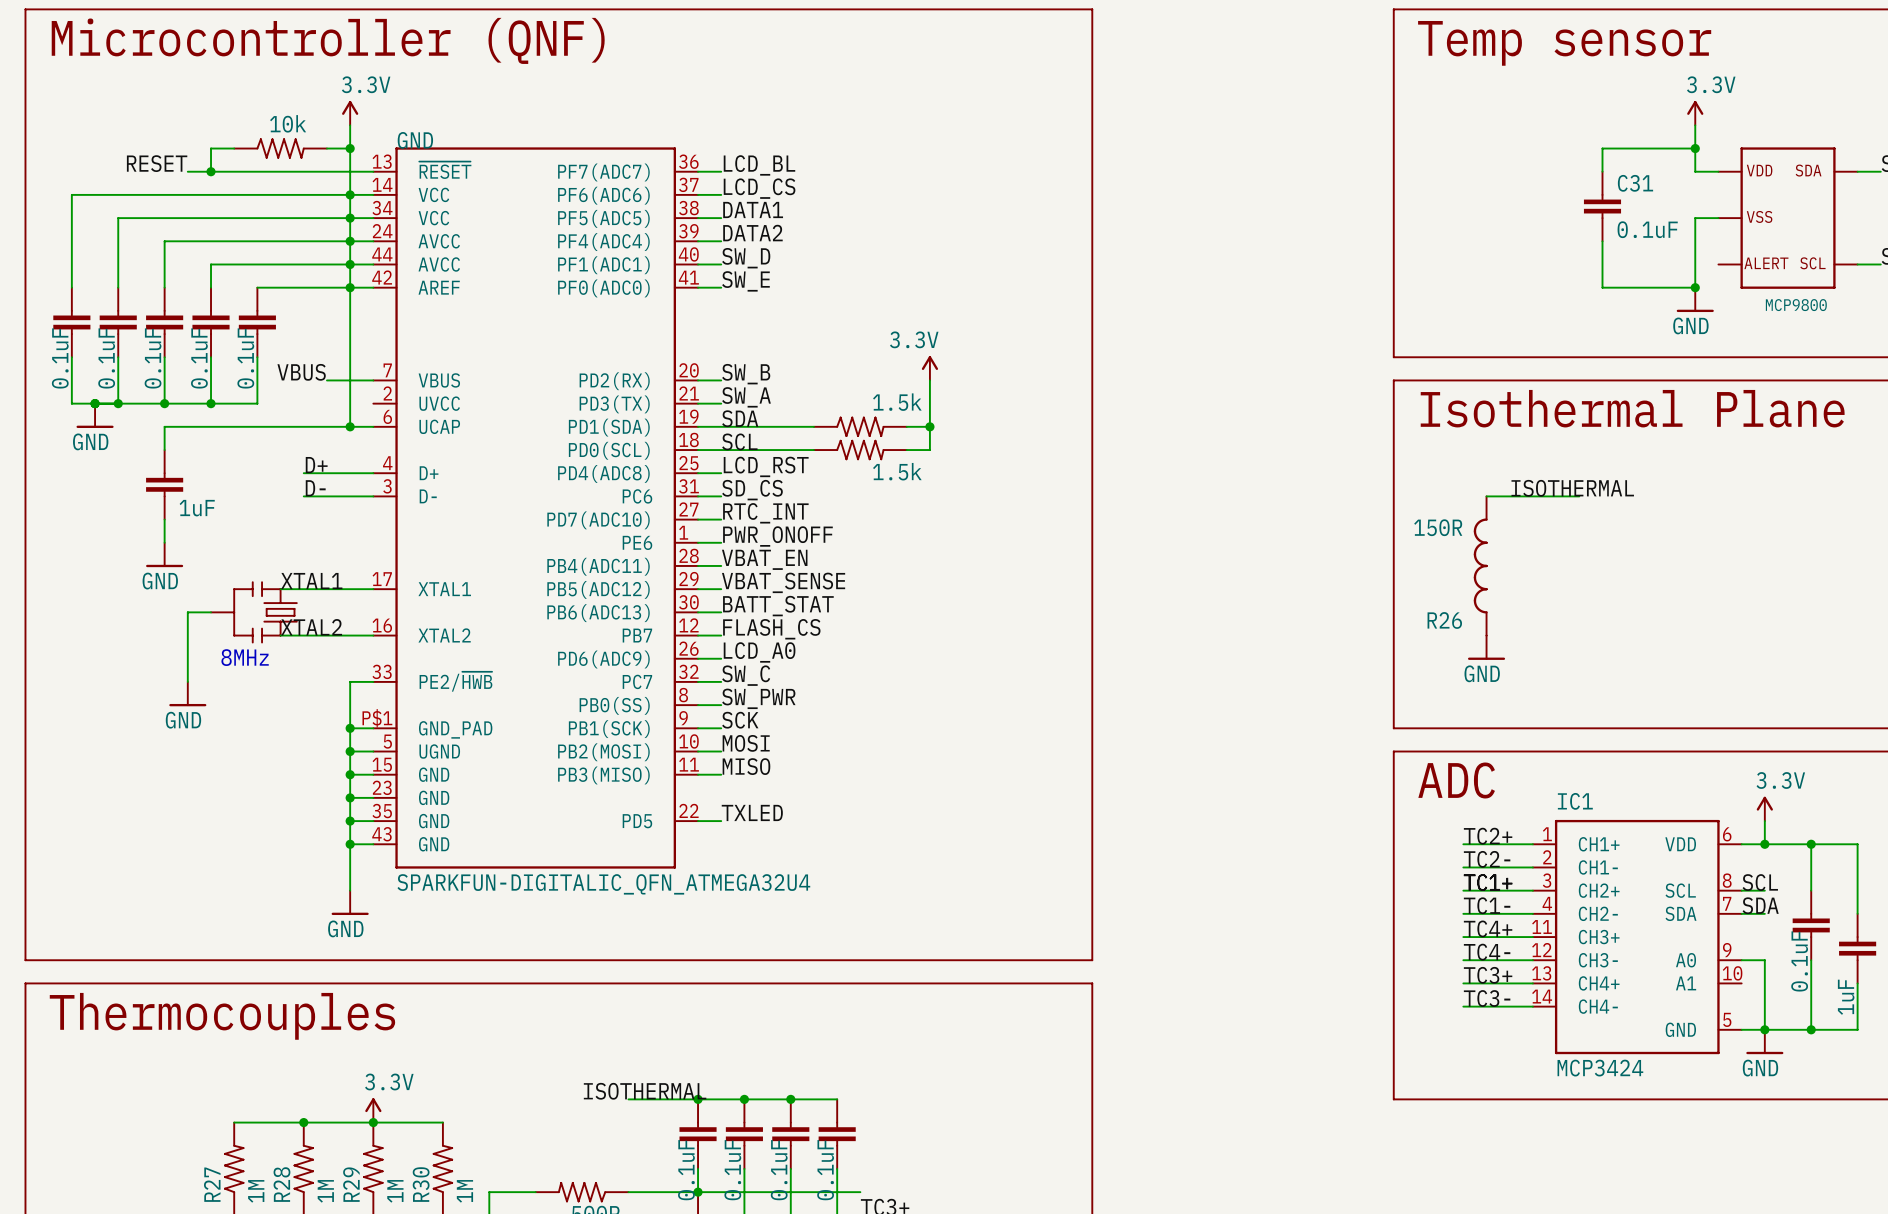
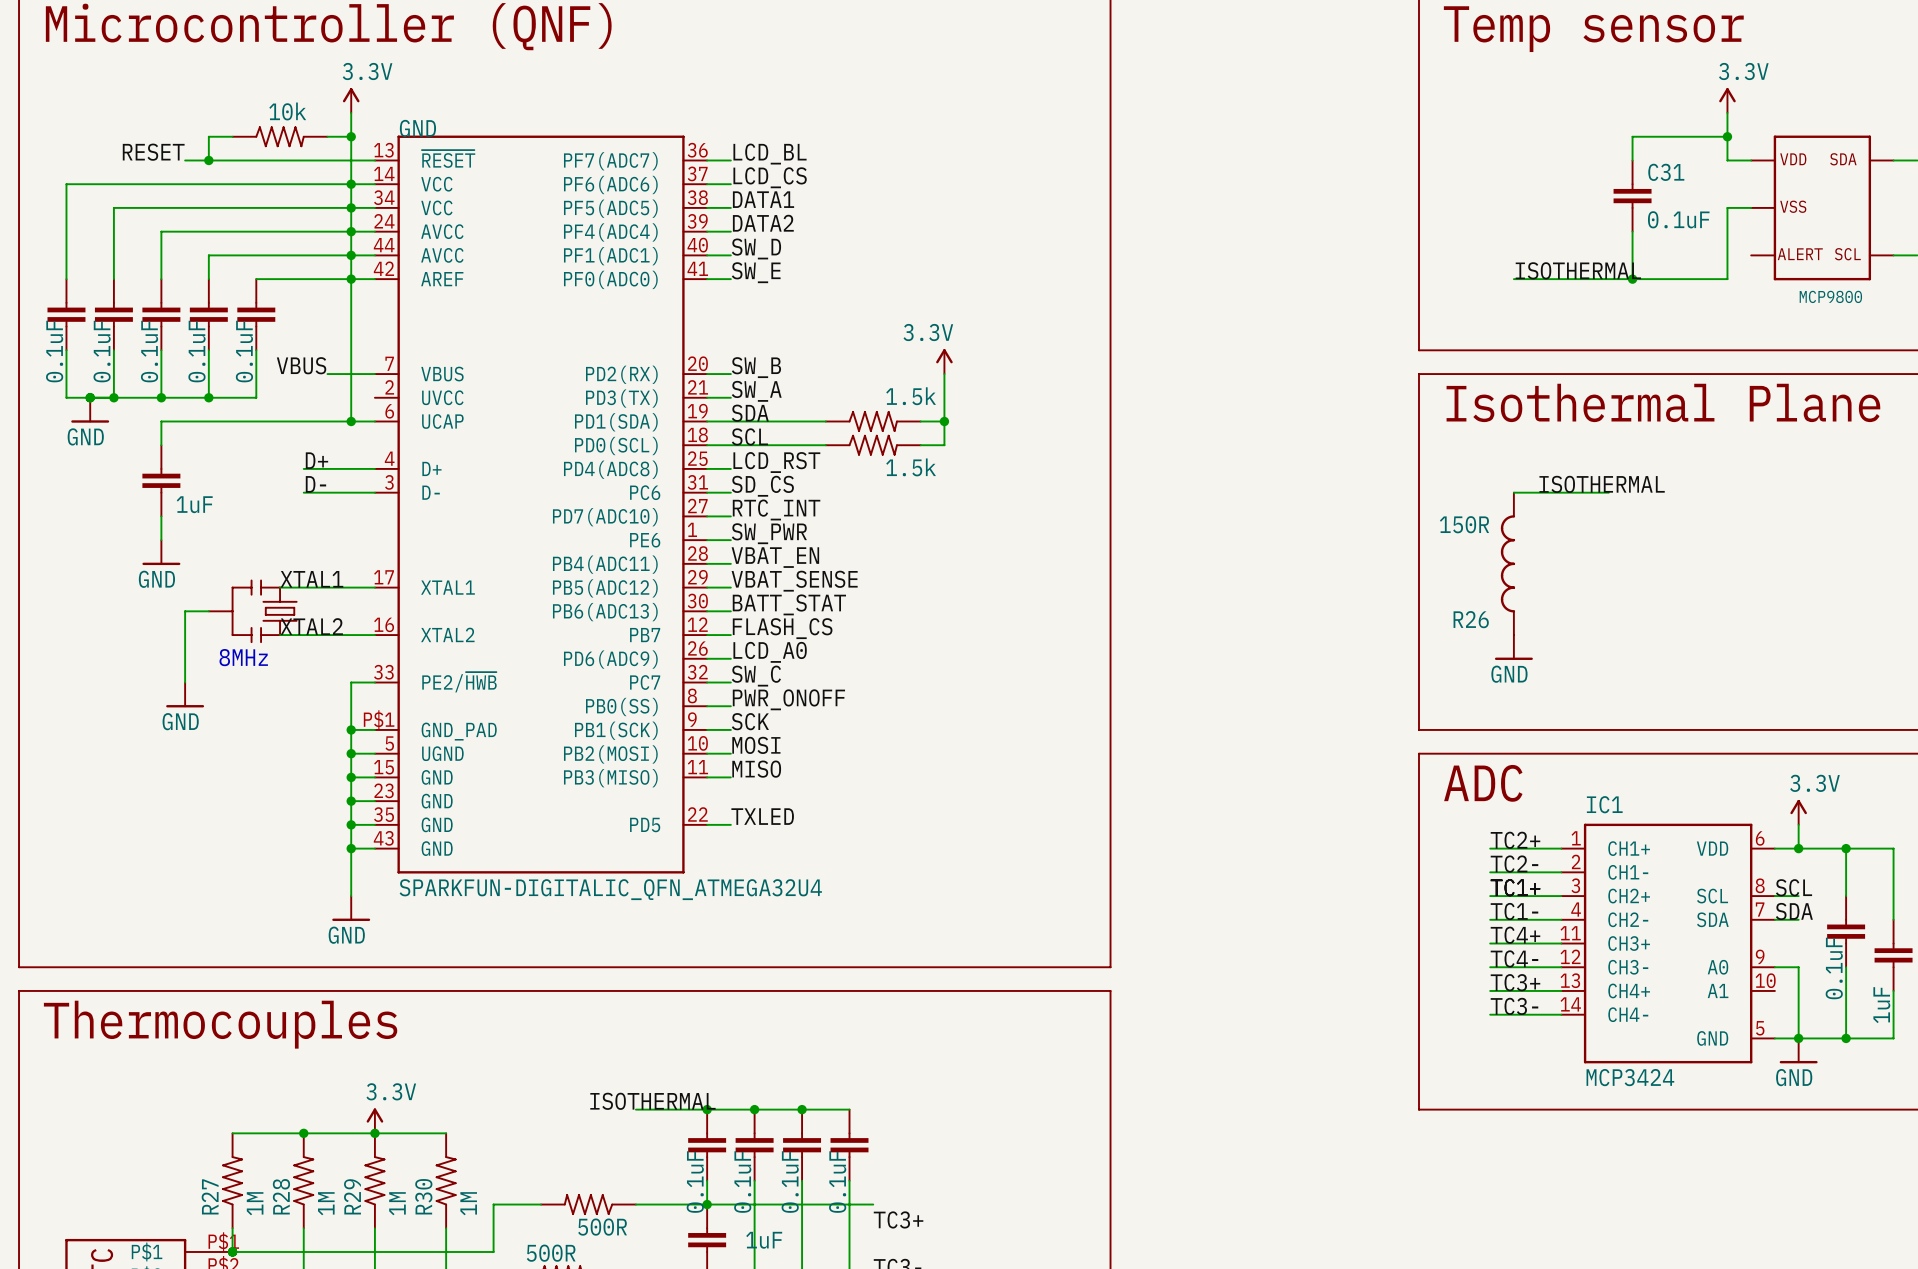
label: none -> ISOTHERMAL (1578, 270)
wire: none -> (1513, 279) (1632, 279)
junction: none -> (1632, 279)
junction: (1695, 287) -> none
power symbol: GND (1695, 299) -> none
label: PWR_ONOFF (777, 536) -> SW_PWR (769, 533)
label: SW_PWR (758, 698) -> PWR_ONOFF (788, 699)

